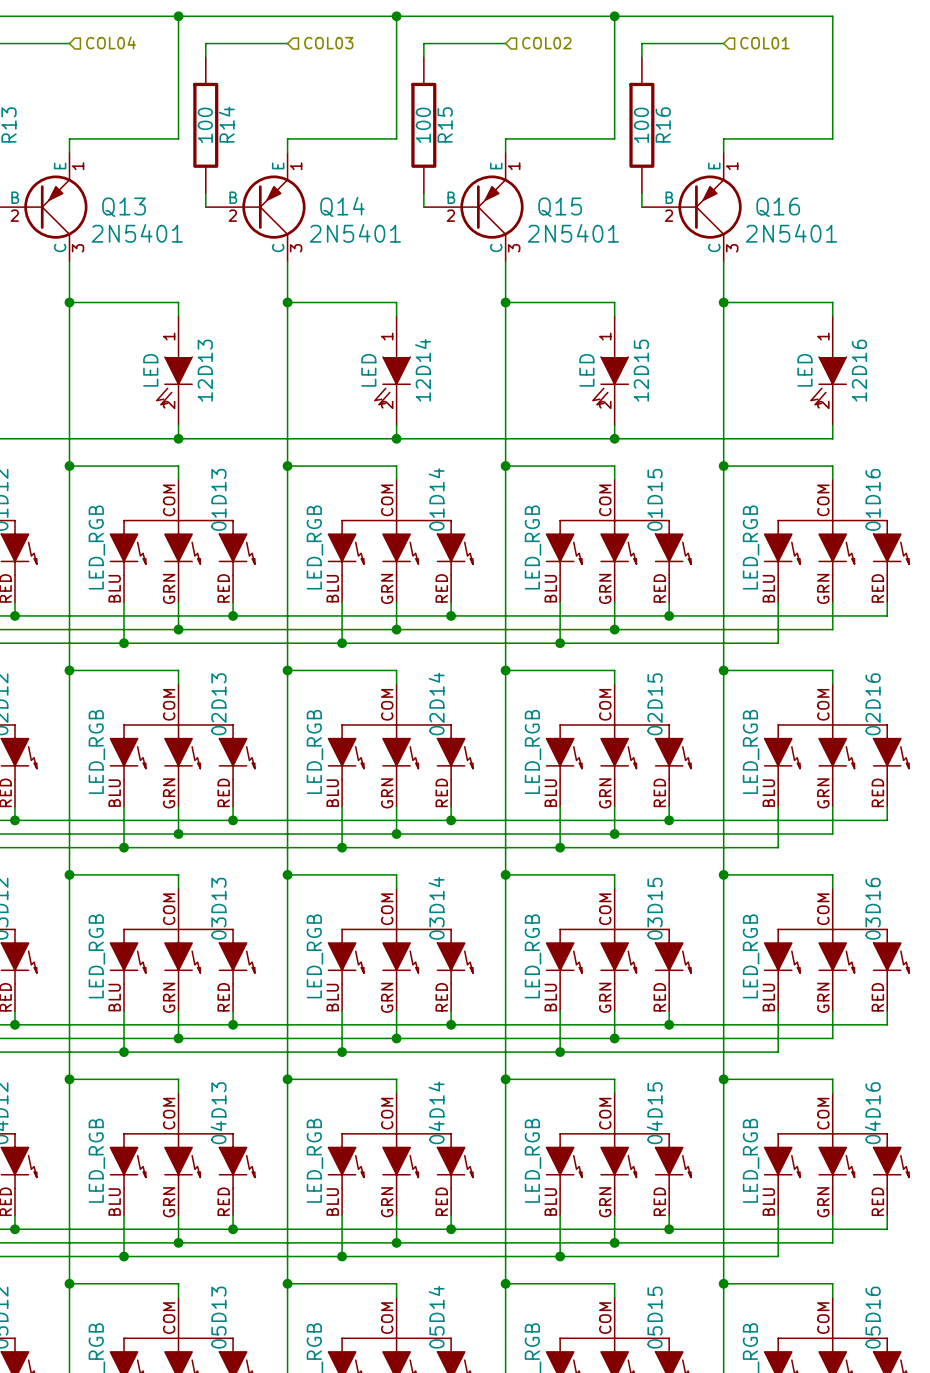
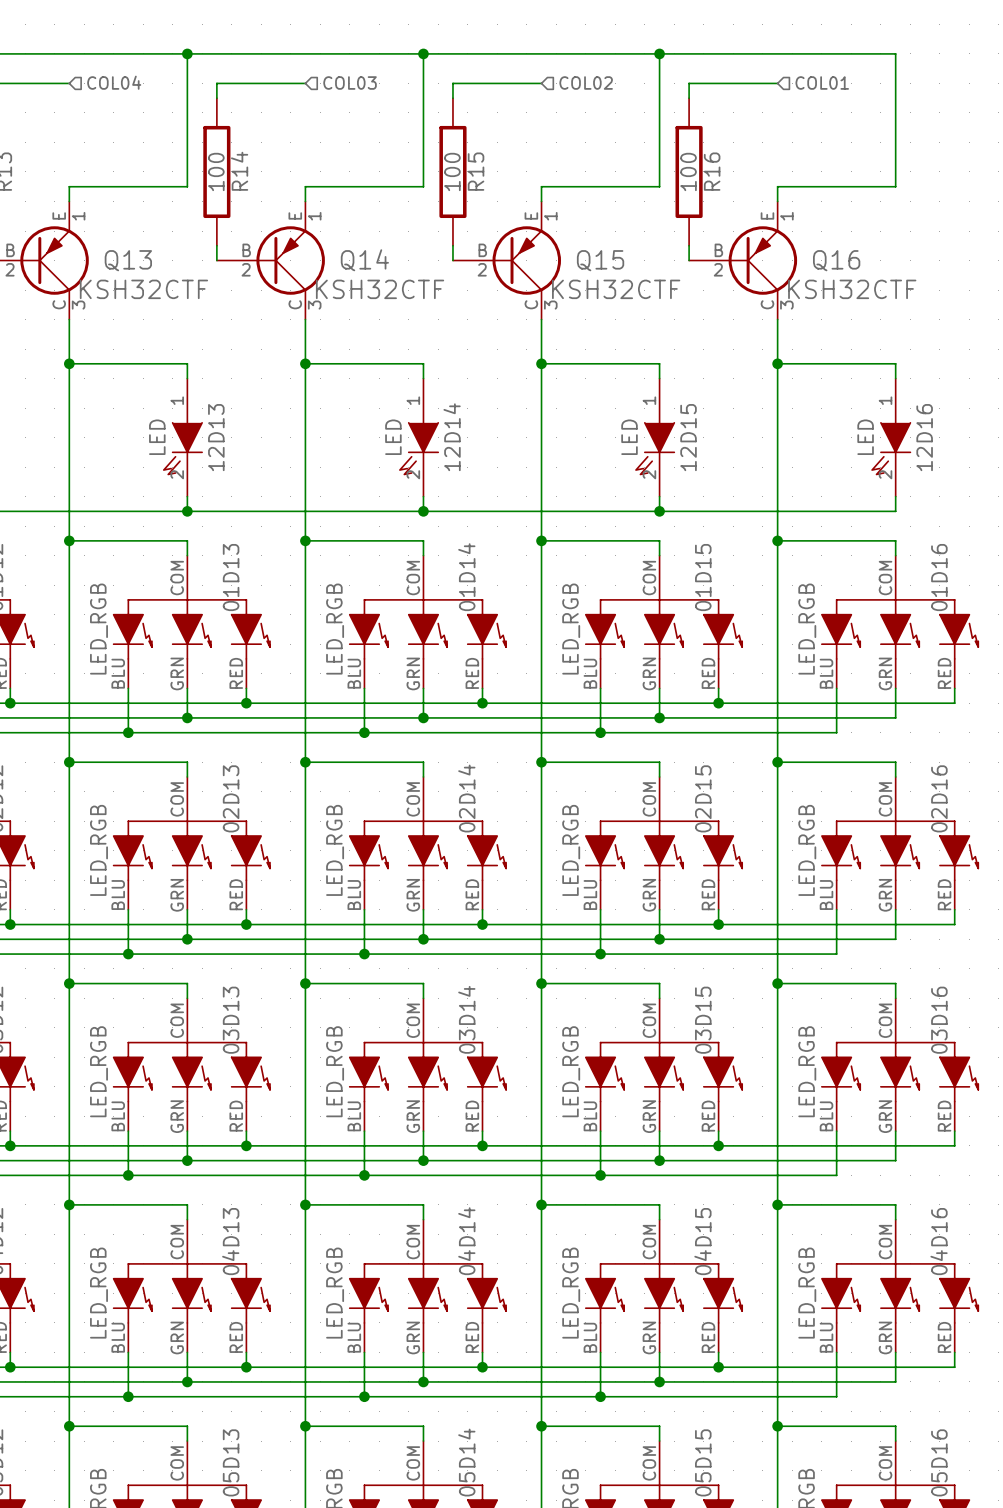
Q13 value: 2N5401 (137, 233) -> KSH32CTF (143, 289)
Q14 value: 2N5401 (355, 233) -> KSH32CTF (380, 289)
Q15 value: 2N5401 (573, 233) -> KSH32CTF (616, 289)
Q16 value: 2N5401 (791, 233) -> KSH32CTF (852, 289)

